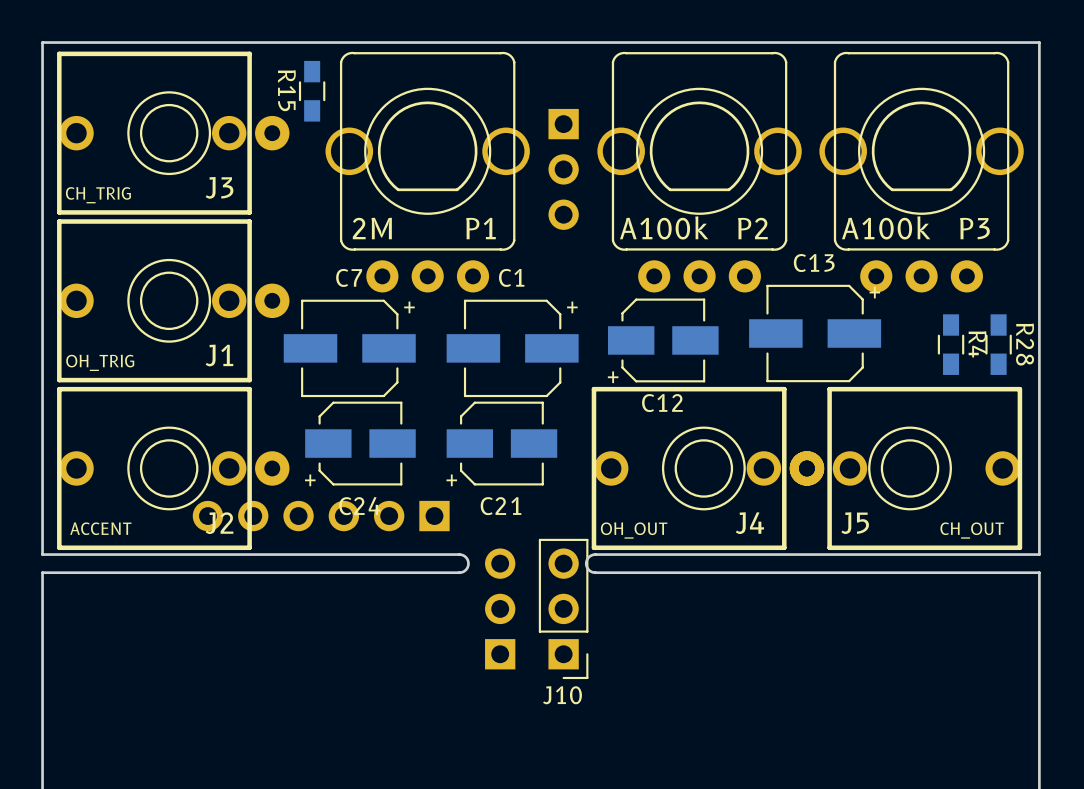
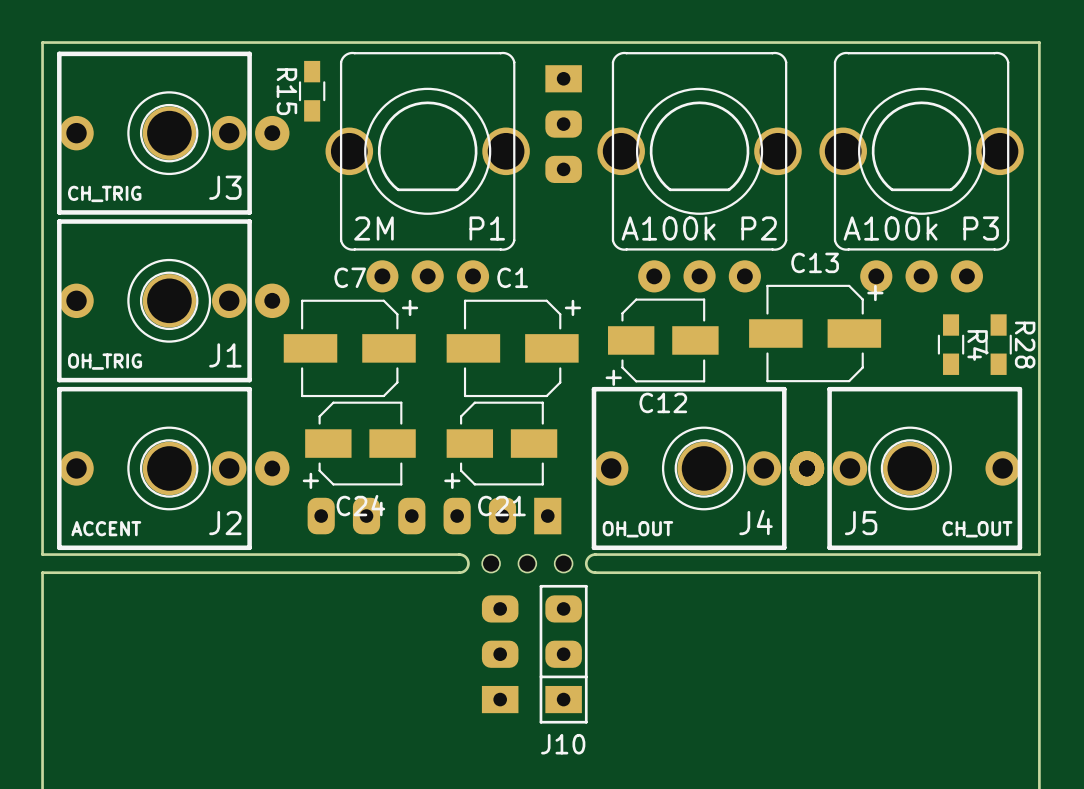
J3 footprint: [57, 51, 290, 215] -> [57, 51, 290, 215]
part: none -> (563, 124)
part: (563, 169) -> none
J1 footprint: [57, 219, 290, 383] -> [57, 219, 290, 383]
J2 footprint: [57, 386, 290, 551] -> [57, 386, 290, 551]
J4 footprint: [591, 386, 825, 551] -> [591, 386, 825, 551]
J5 footprint: [789, 386, 1023, 551] -> [789, 386, 1023, 551]
part: (321, 516) -> none
part: none -> (434, 516)
J10 footprint: [538, 538, 589, 680] -> [539, 584, 588, 724]
part: none -> (527, 563)
part: (500, 608) -> none
part: none -> (500, 654)

